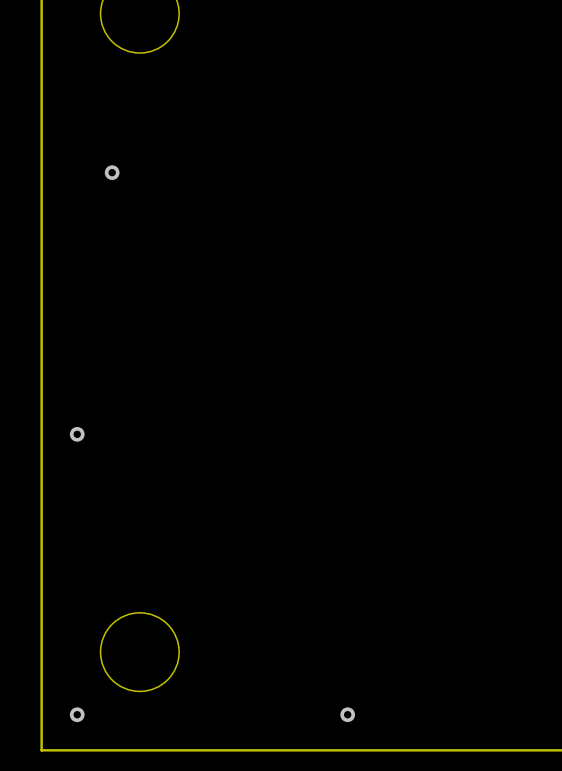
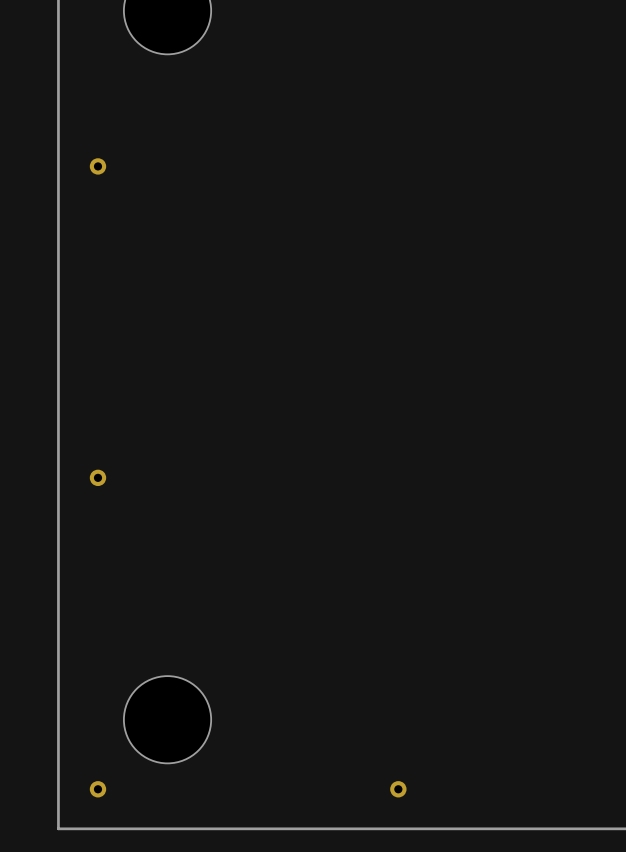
via position: (112, 172) -> (97, 166)

